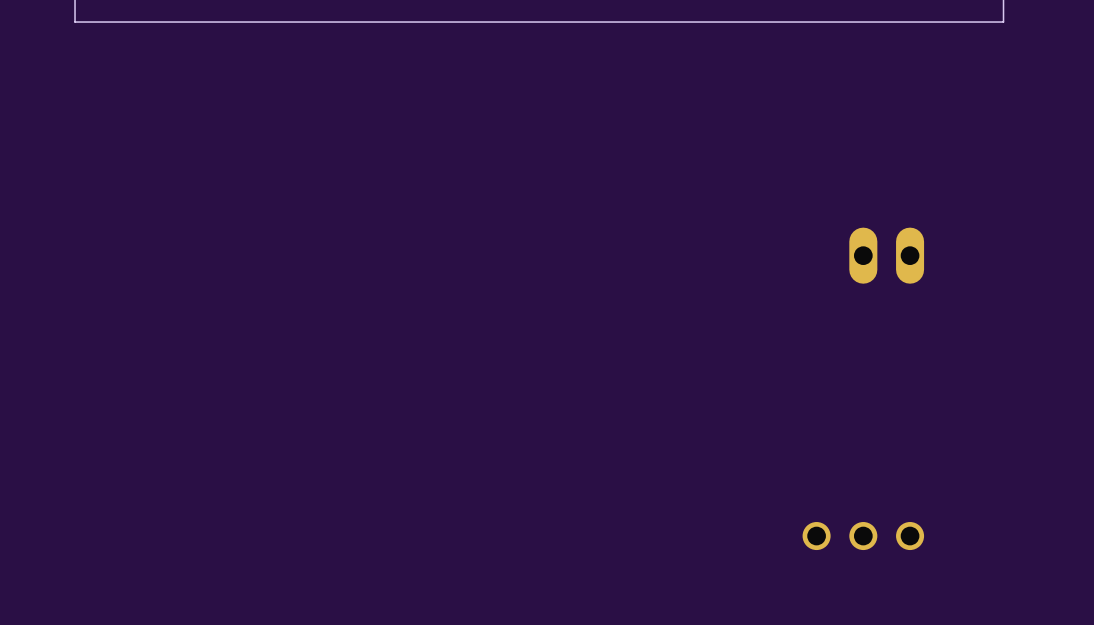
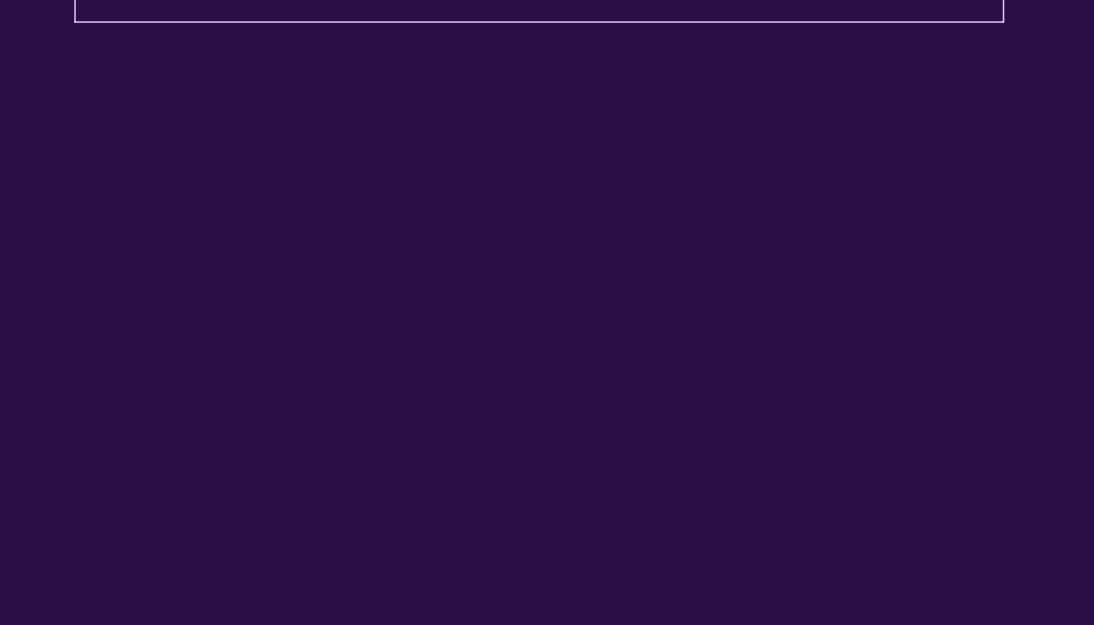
part: (886, 255) -> none
part: (863, 536) -> none

